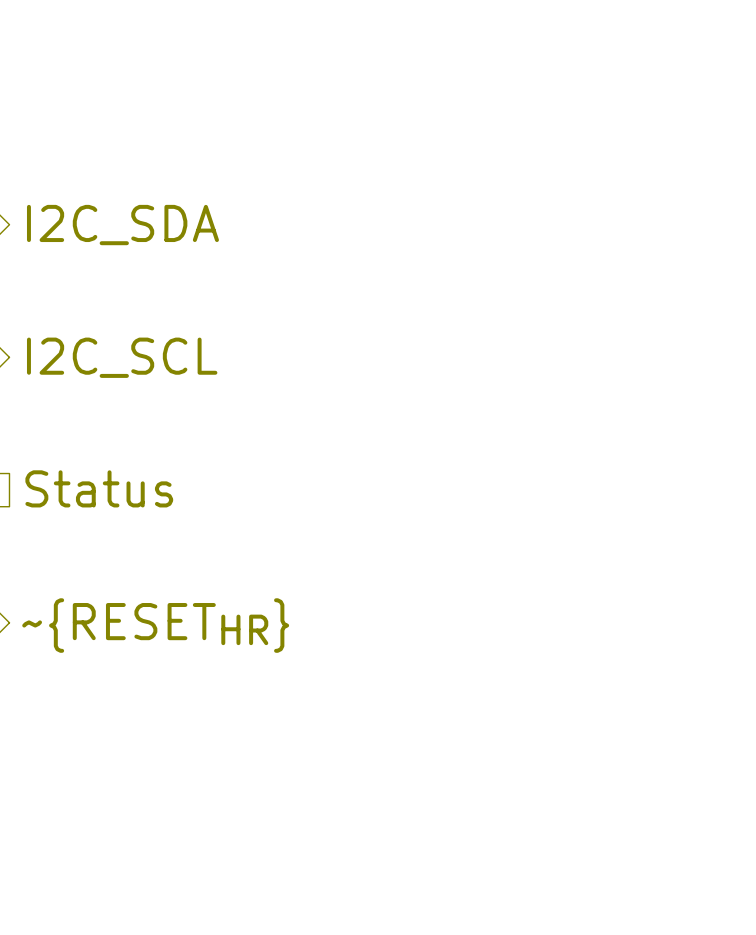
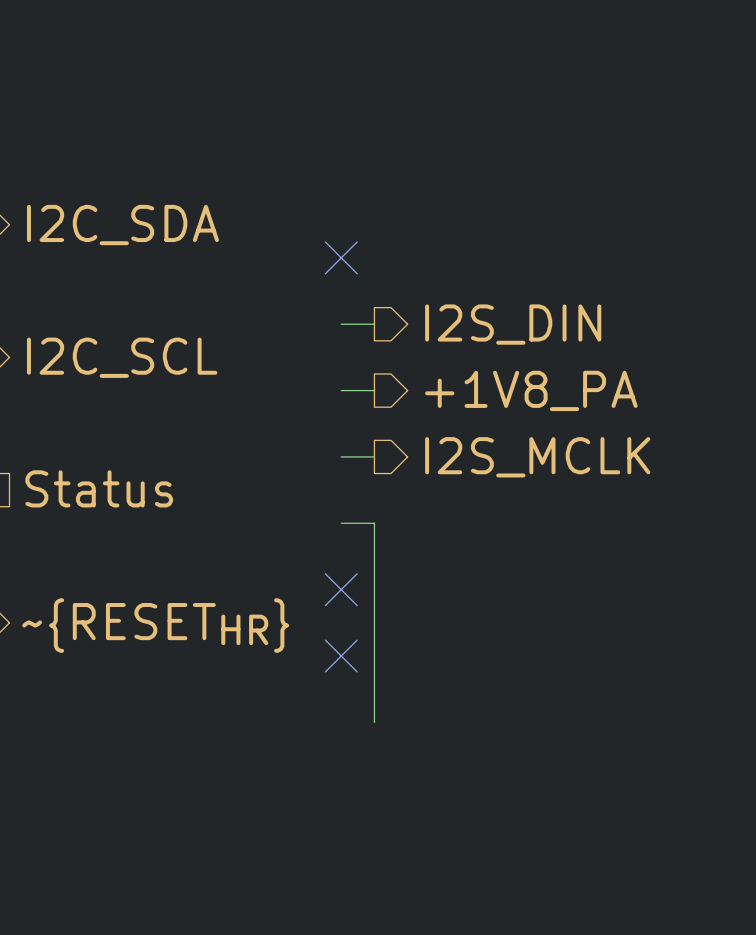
no-connect mark: none -> (341, 257)
wire: none -> (341, 324) (374, 324)
hierarchical label: none -> I2S_DIN (513, 324)
wire: none -> (341, 390) (374, 390)
hierarchical label: none -> +1V8_PA (531, 390)
wire: none -> (341, 456) (374, 456)
hierarchical label: none -> I2S_MCLK (537, 457)
wire: none -> (341, 523) (374, 523) (374, 722)
no-connect mark: none -> (341, 589)
no-connect mark: none -> (341, 656)

